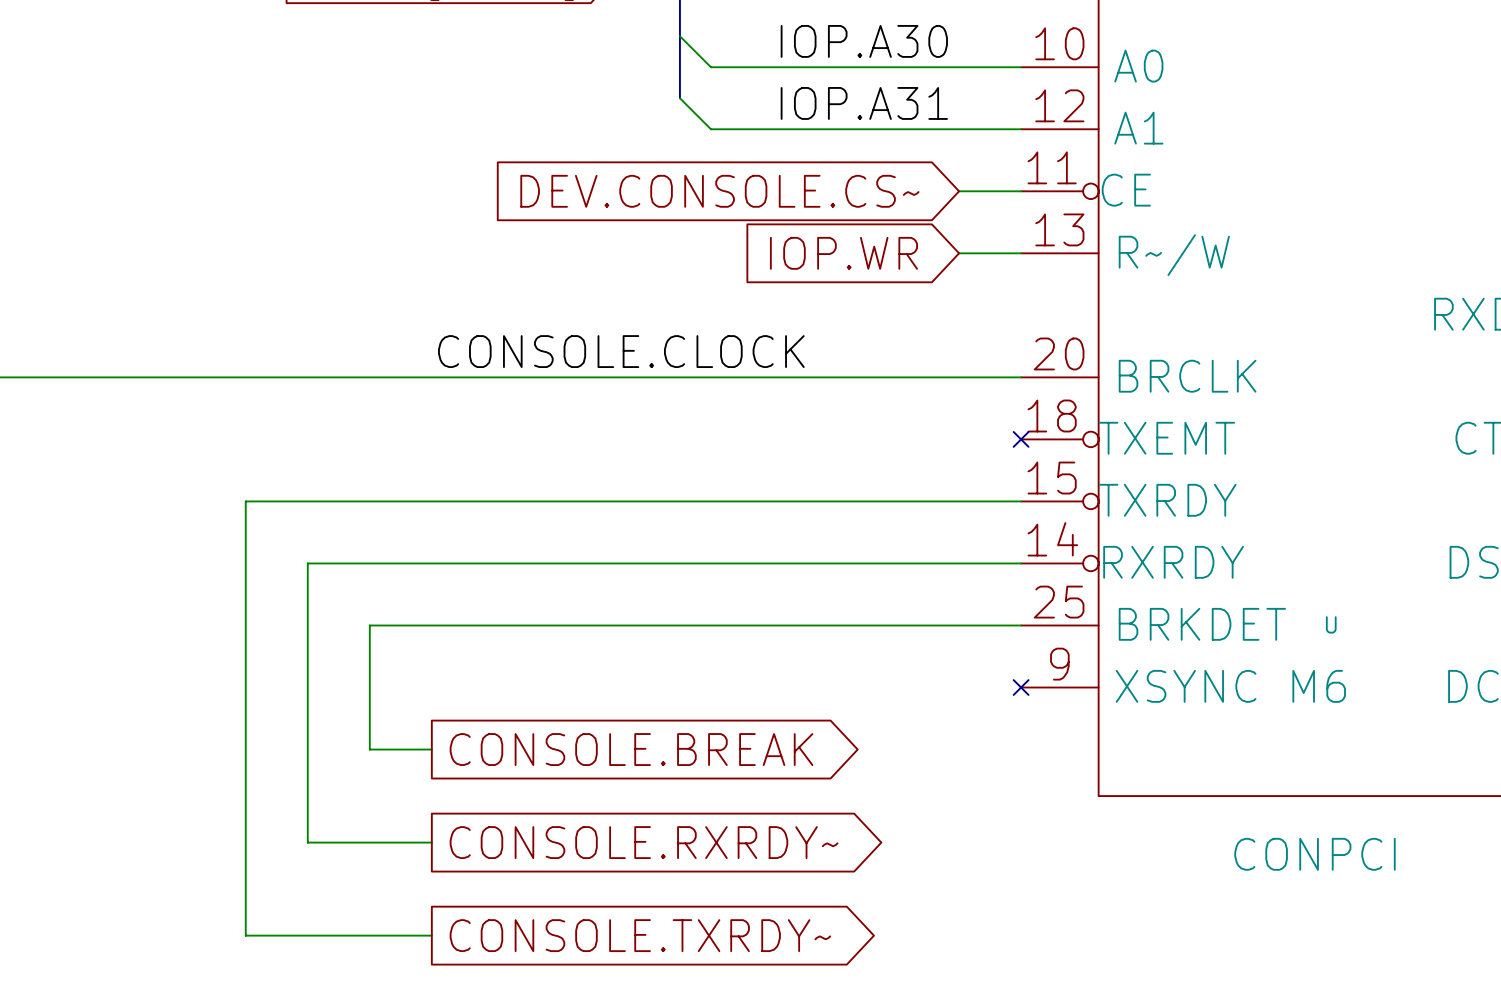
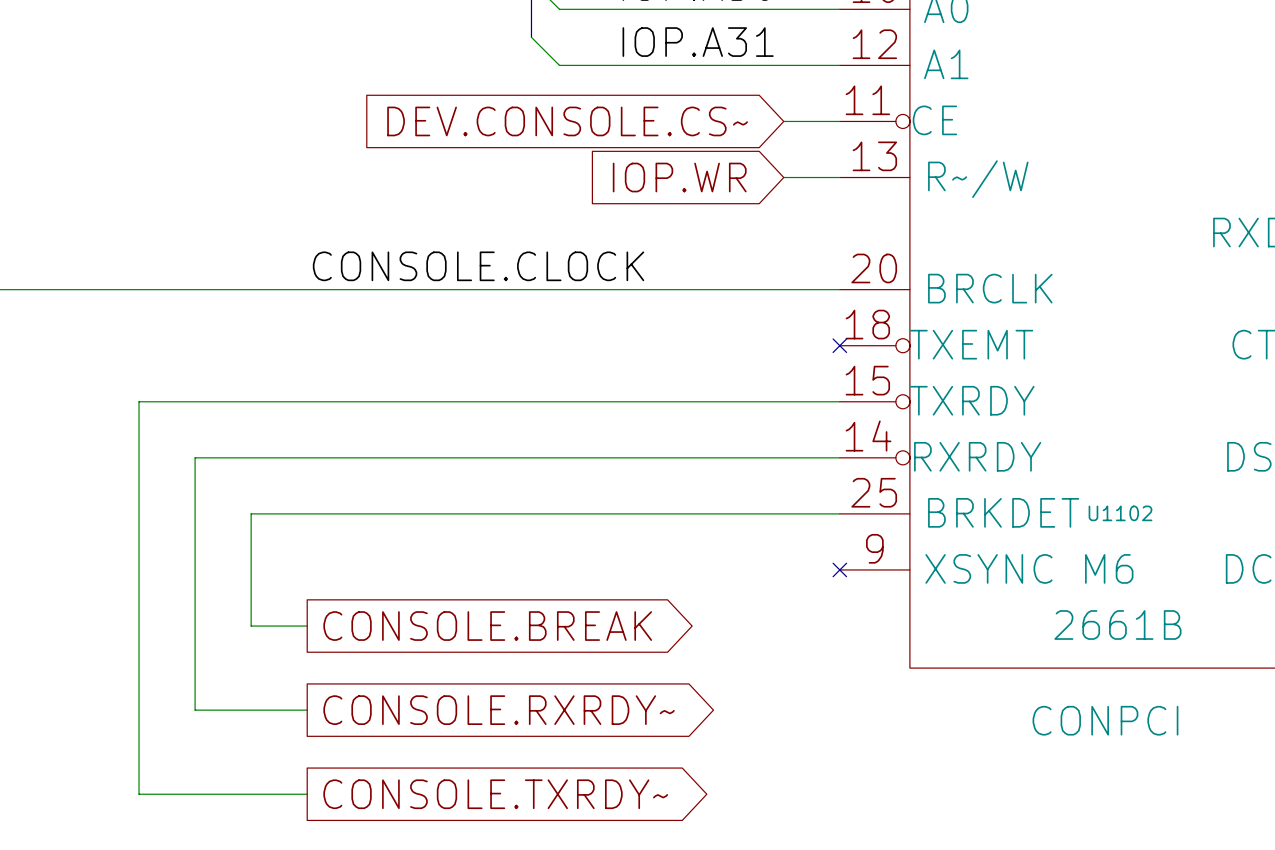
U name: U (1331, 624) -> U1102 (1120, 513)
U value: none -> 2661B (1117, 624)

